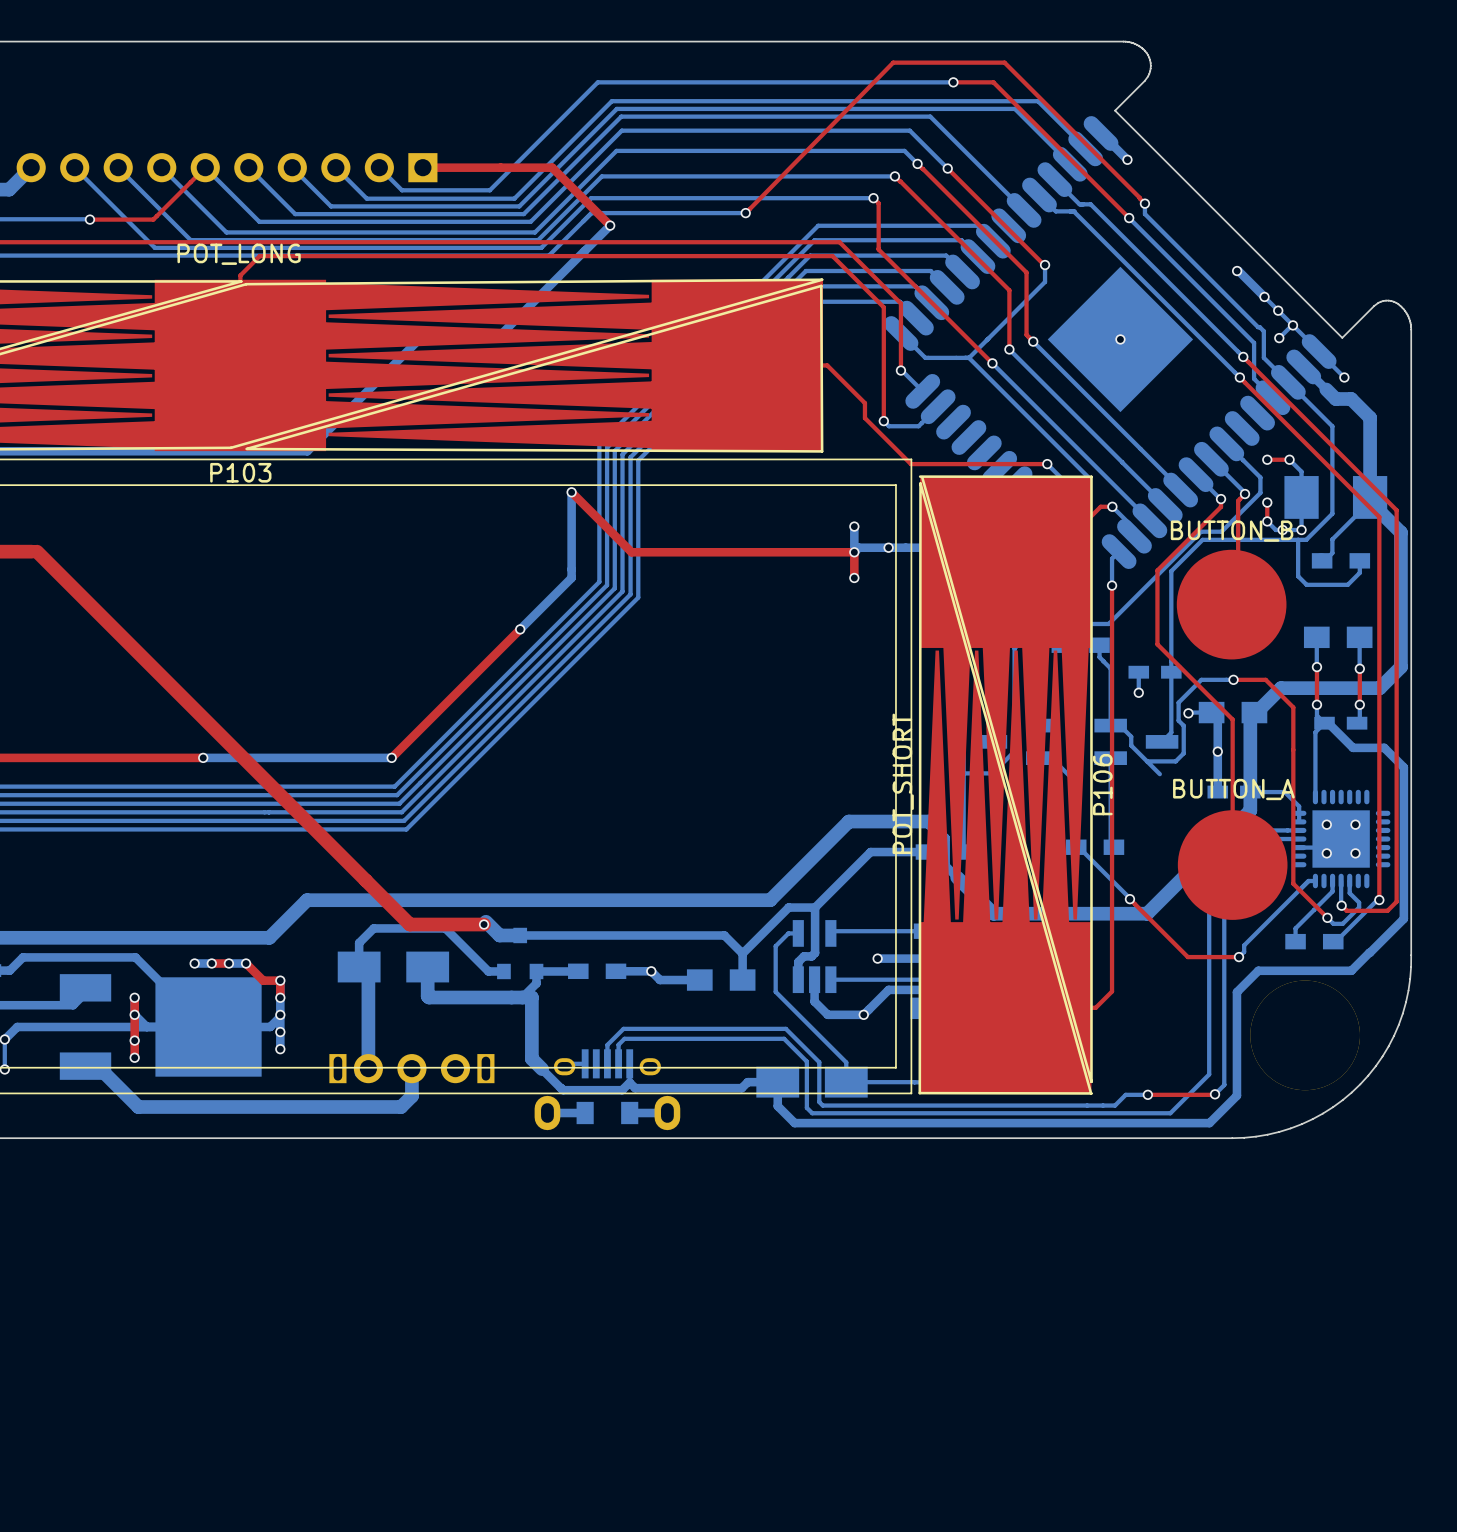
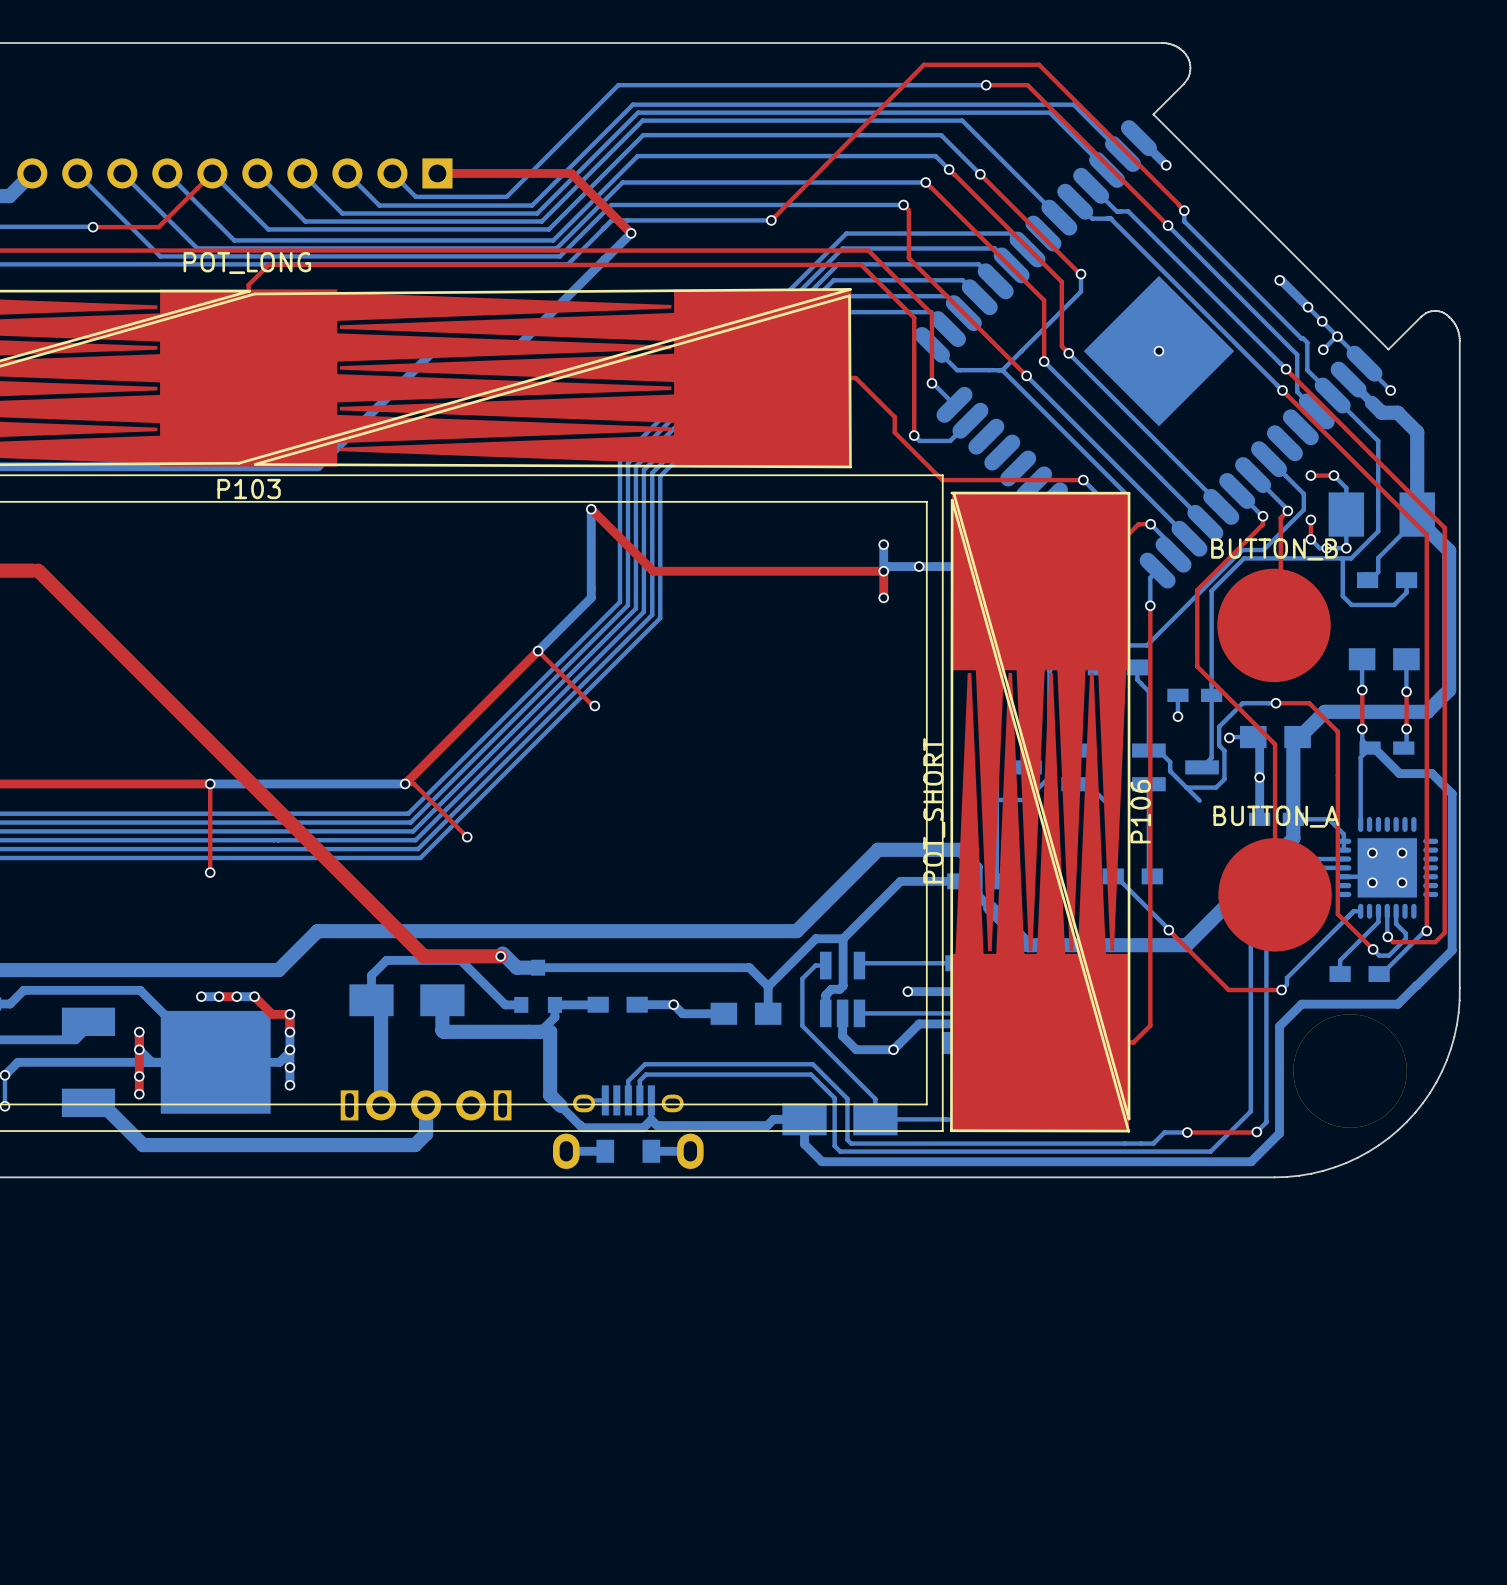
top track: none -> (538, 651) (594, 705)
via: none -> (594, 705)
top track: none -> (210, 783) (210, 872)
top track: none -> (405, 783) (414, 783) (467, 837)
via: none -> (467, 837)
via: none -> (210, 872)

